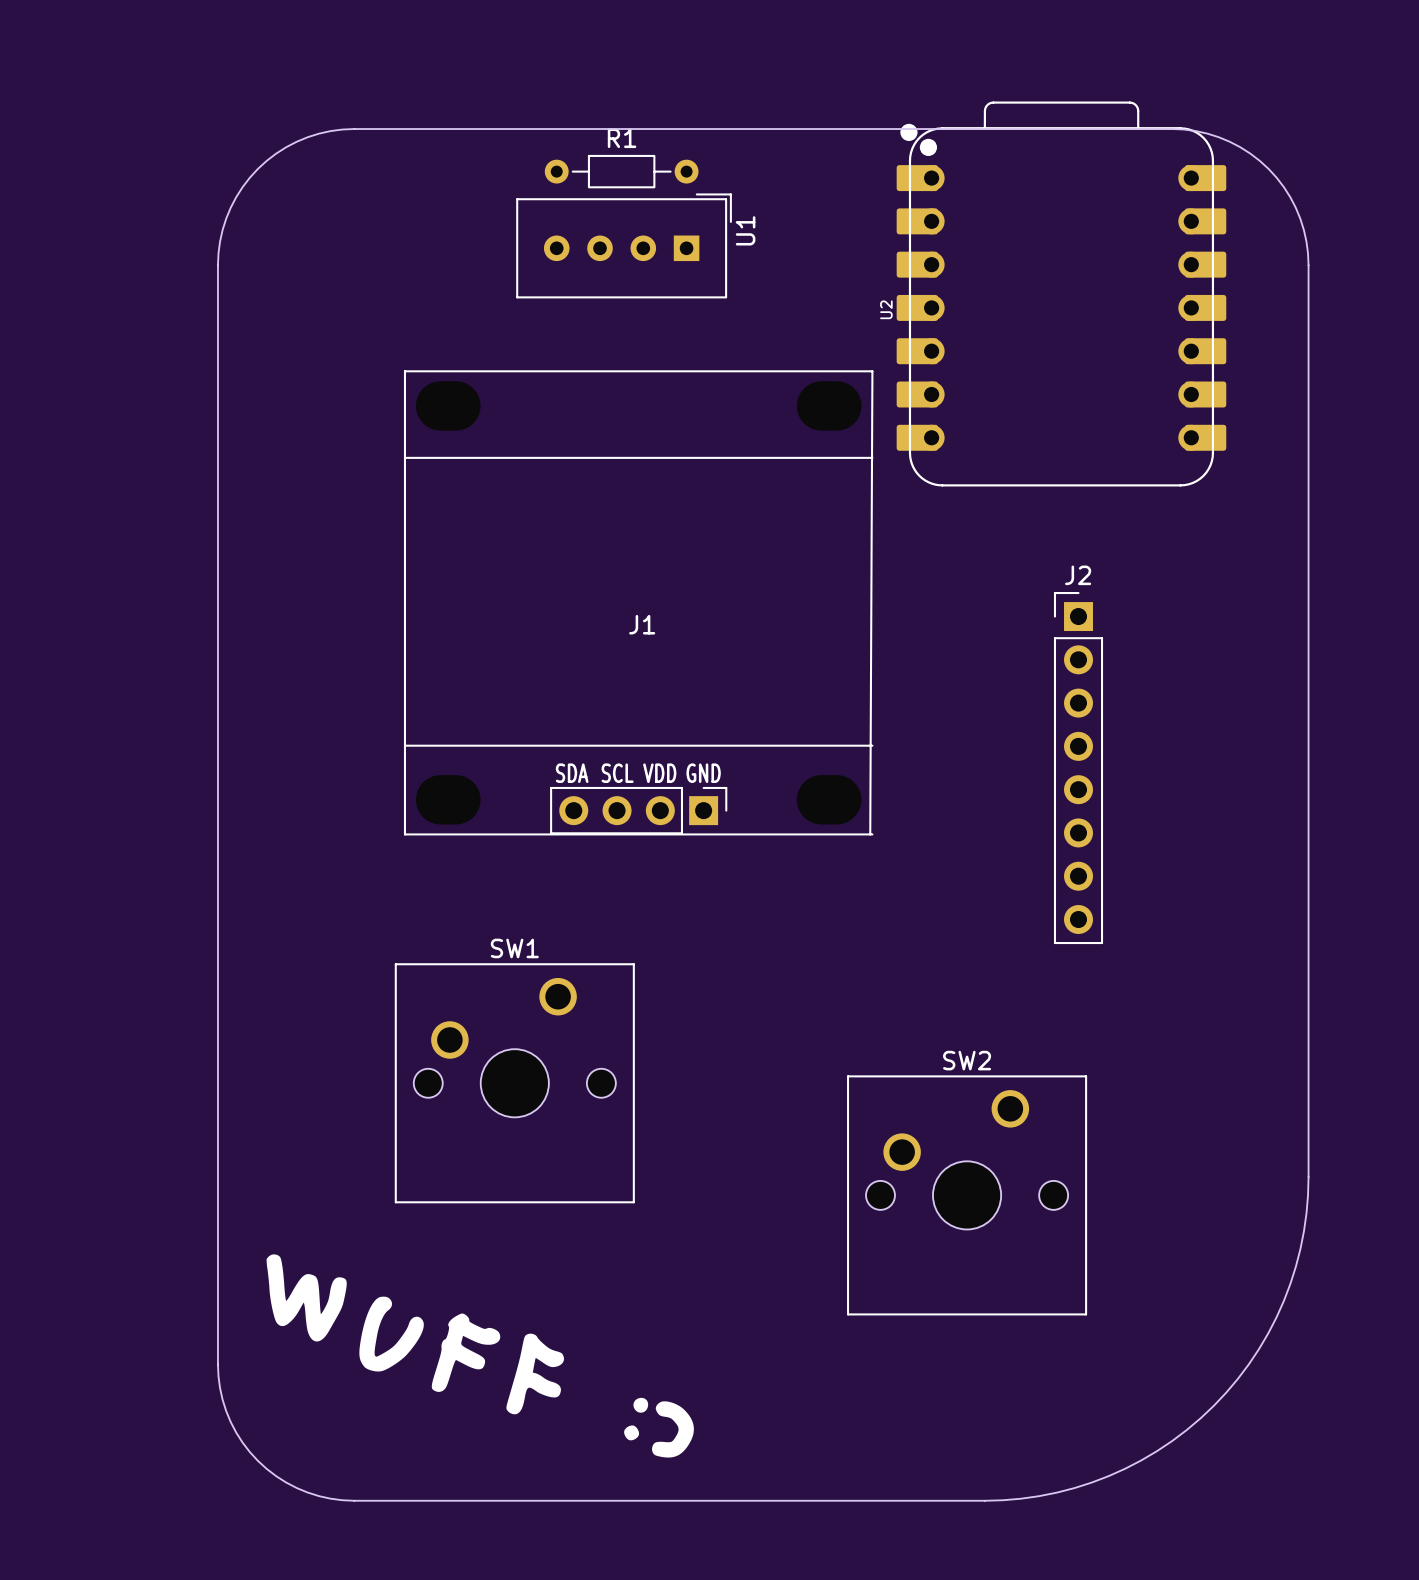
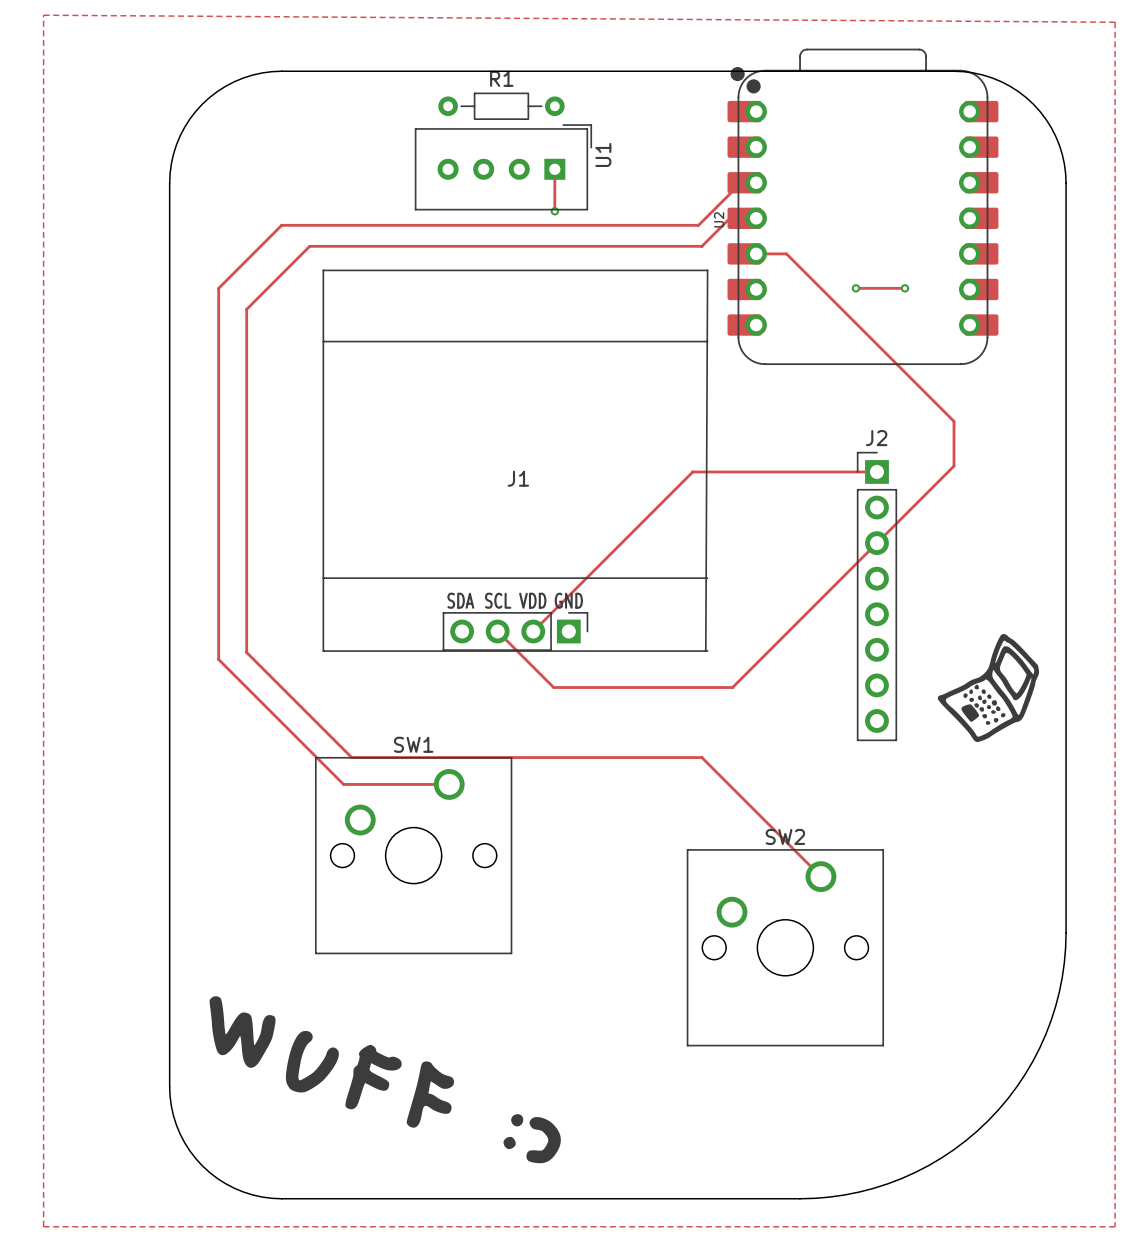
zone outline: none -> (43, 15) (1115, 22) (1115, 1226) (43, 1226) (43, 15)
track: none -> (554, 169) (554, 211)
track: none -> (756, 182) (741, 182) (698, 225) (281, 225) (218, 288) (218, 659) (343, 784) (449, 784)
via: none -> (554, 211)
track: none -> (756, 218) (729, 218) (701, 246) (309, 246) (246, 309) (246, 652) (351, 757) (701, 757) (820, 876)
track: none -> (756, 253) (786, 253) (954, 421) (954, 466) (732, 687) (553, 687) (497, 631)
track: none -> (855, 288) (904, 288)
via: none -> (855, 288)
via: none -> (904, 288)
track: none -> (876, 471) (692, 471) (533, 631)
drawing: none -> [937, 634, 1040, 743]

